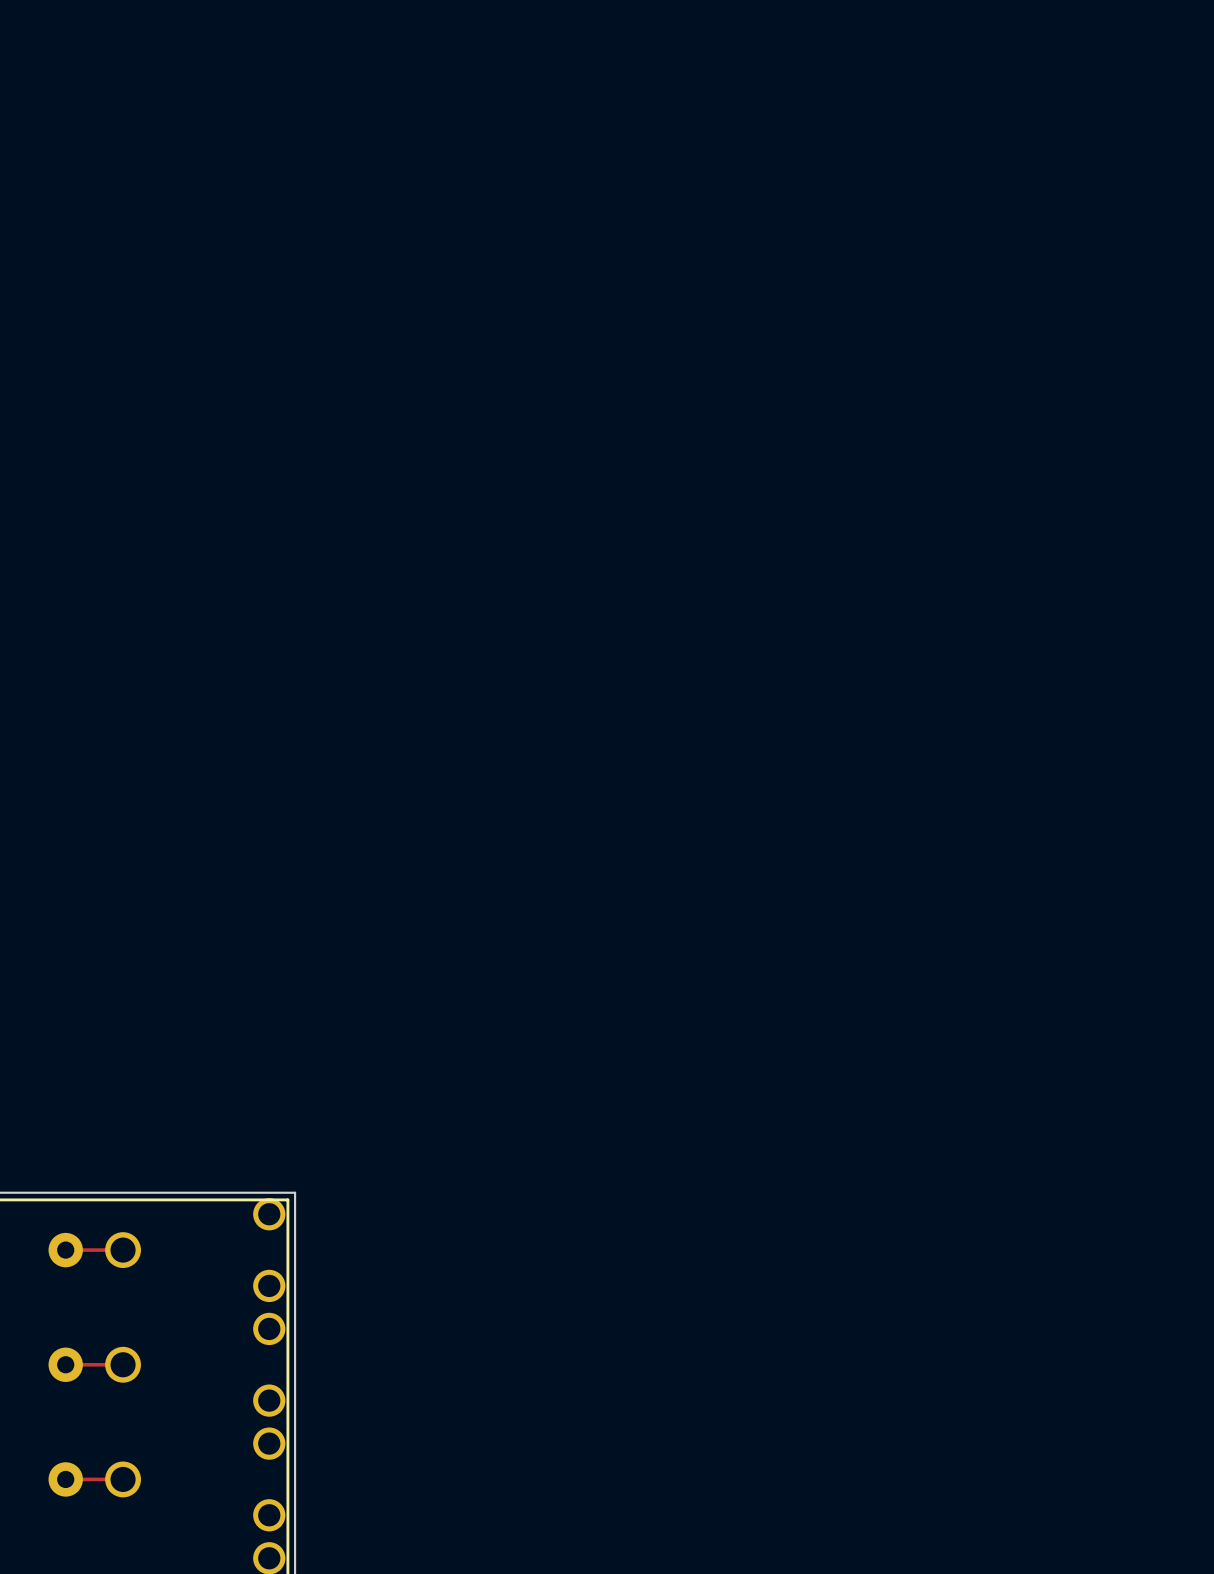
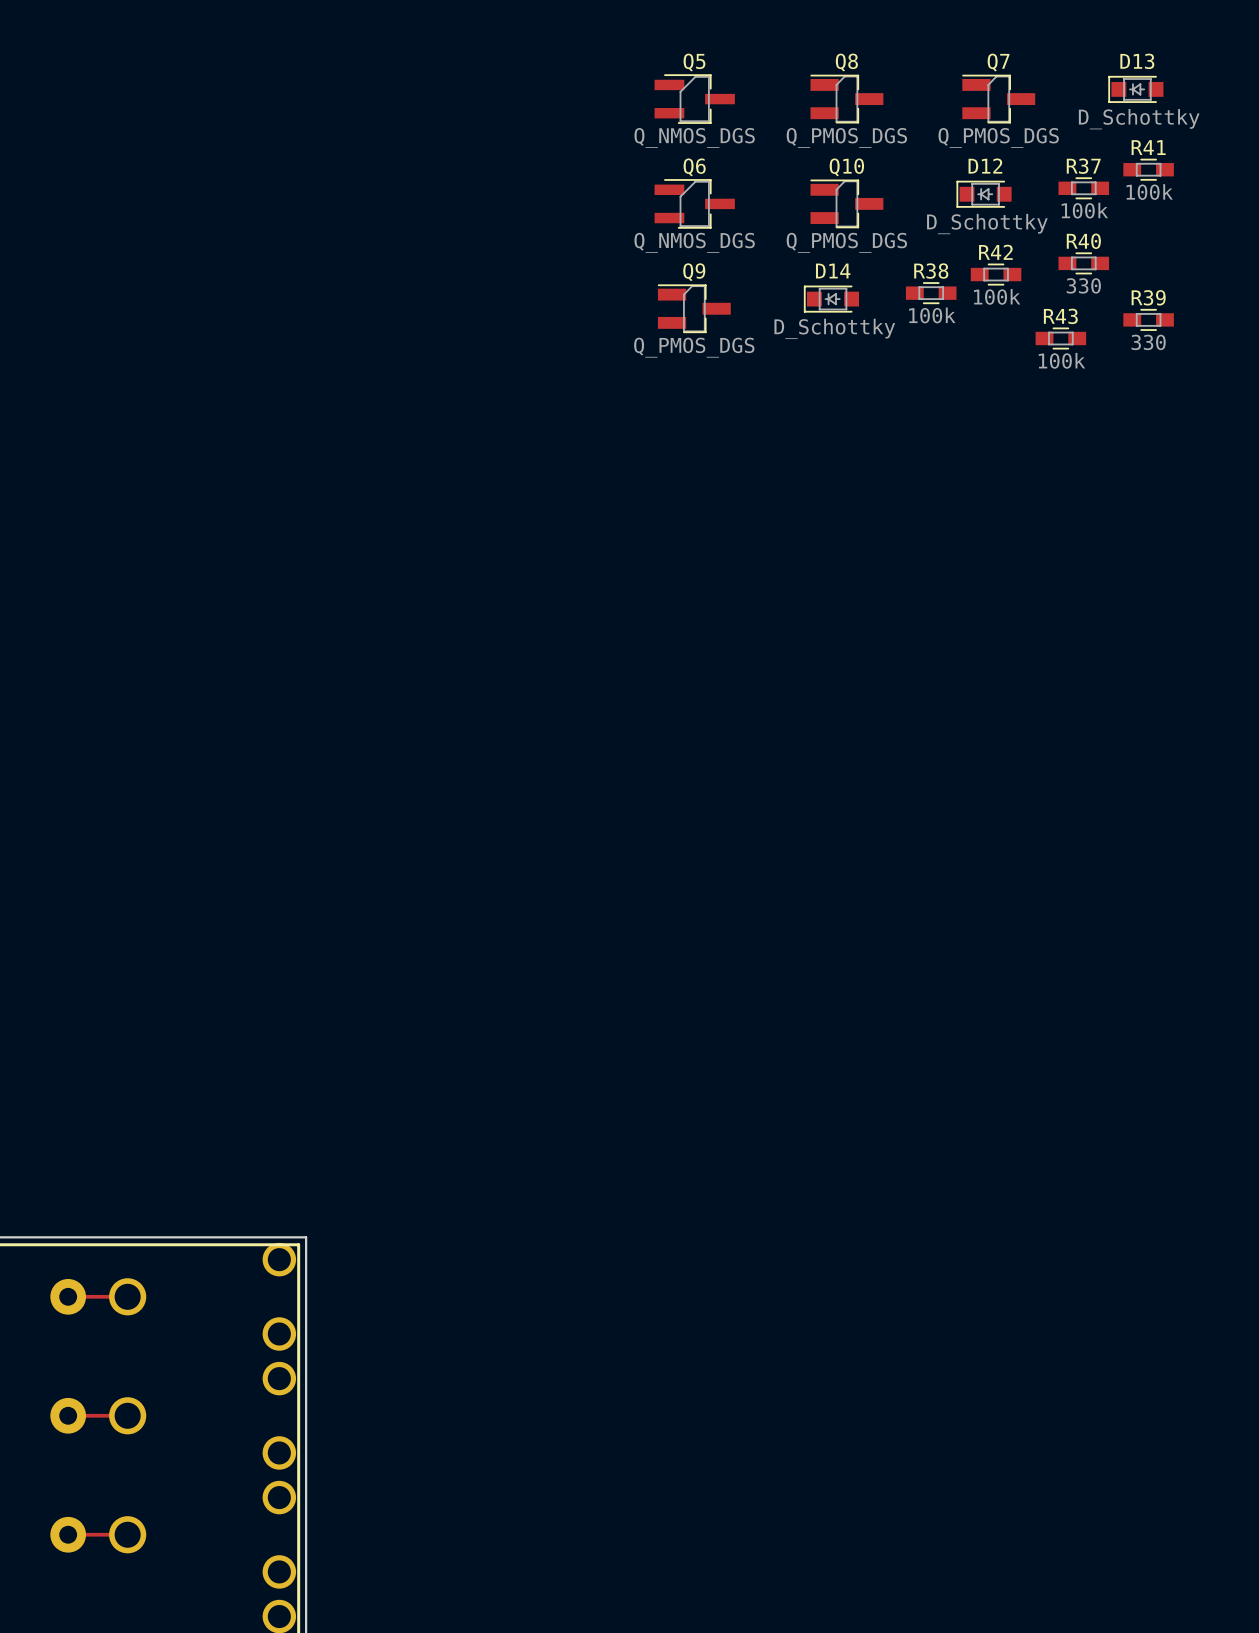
D13: none -> D_Schottky (1135, 89)
Q5: none -> Q_NMOS_DGS (694, 99)
Q8: none -> Q_PMOS_DGS (846, 99)
Q7: none -> Q_PMOS_DGS (998, 99)
R41: none -> 100k (1148, 169)
R37: none -> 100k (1083, 188)
D12: none -> D_Schottky (984, 194)
Q6: none -> Q_NMOS_DGS (694, 203)
Q10: none -> Q_PMOS_DGS (846, 203)
R40: none -> 330 (1083, 263)
R42: none -> 100k (996, 274)
R38: none -> 100k (931, 293)
D14: none -> D_Schottky (831, 299)
Q9: none -> Q_PMOS_DGS (694, 308)
R39: none -> 330 (1148, 319)
R43: none -> 100k (1060, 338)

